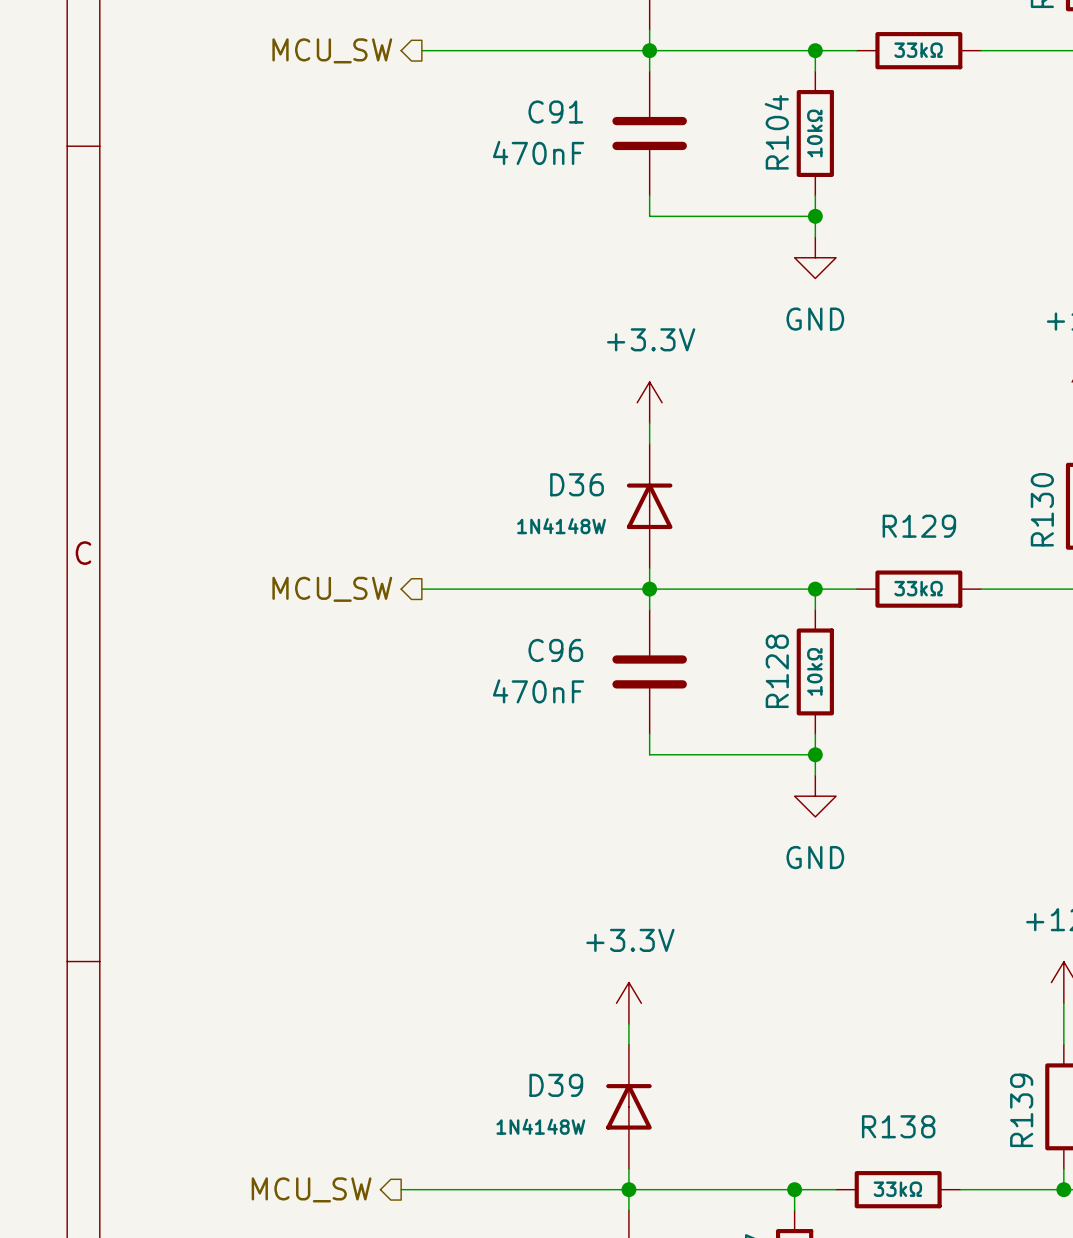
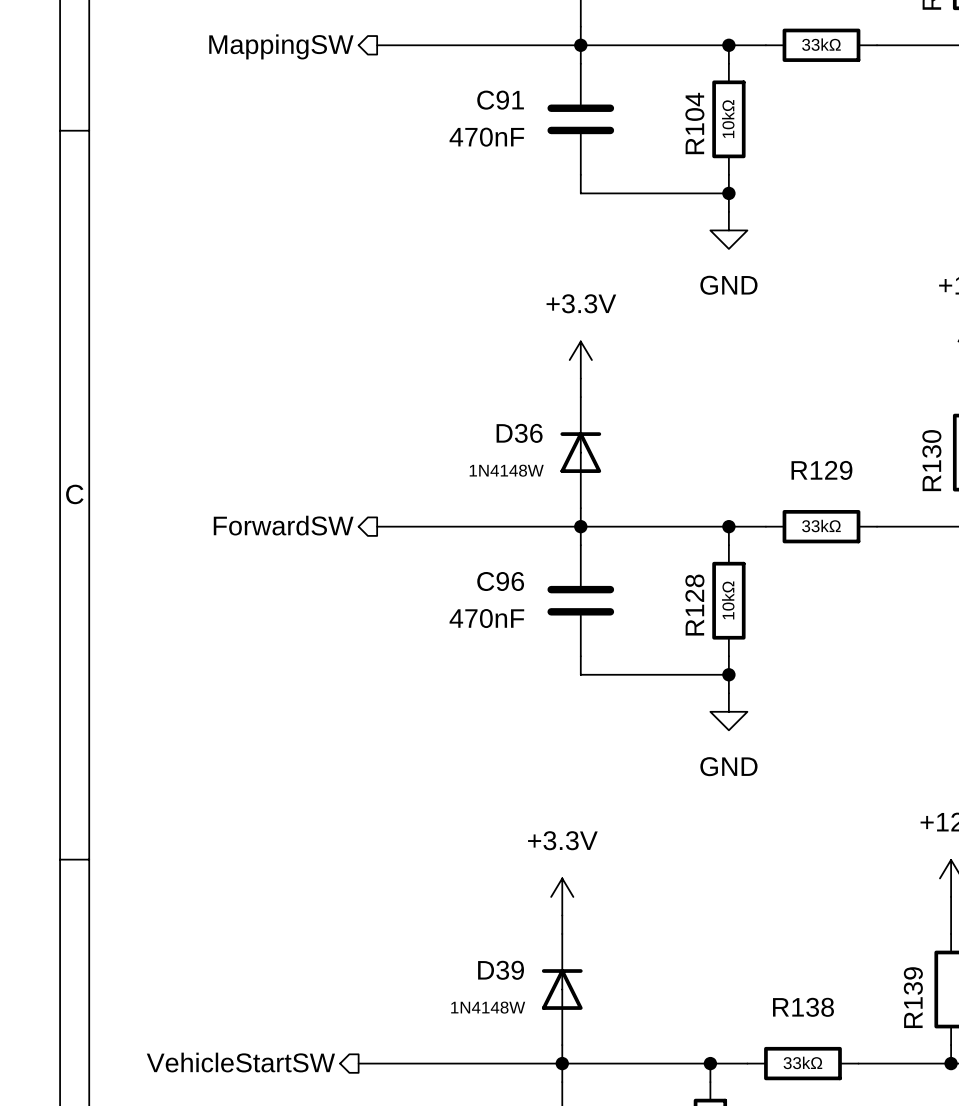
hierarchical label: MCU_SW (332, 50) -> MappingSW (281, 46)
hierarchical label: MCU_SW (332, 589) -> ForwardSW (283, 525)
hierarchical label: MCU_SW (311, 1189) -> VehicleStartSW (240, 1062)

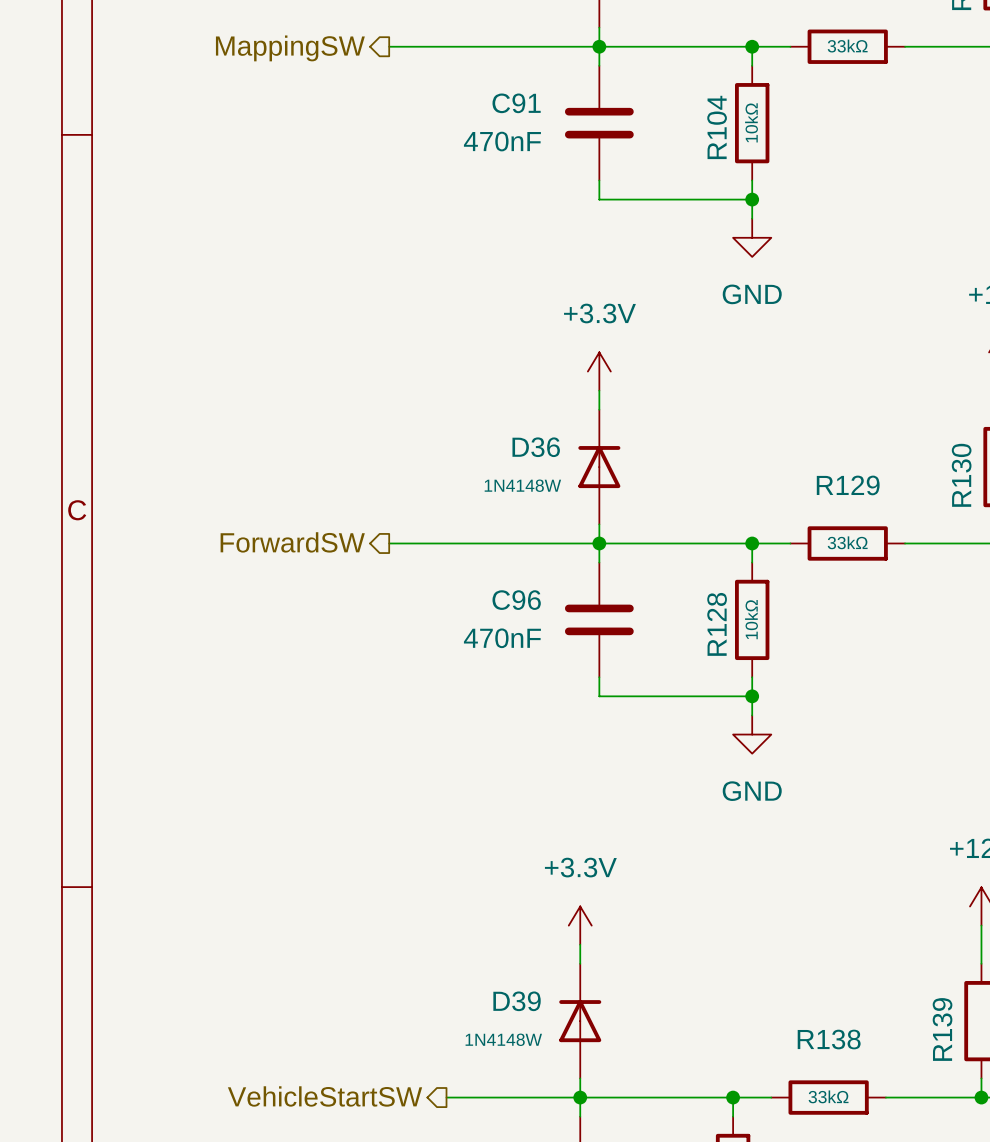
hierarchical label position: VehicleStartSW (240, 1062) -> VehicleStartSW (325, 1096)
wire: (358, 1063) (432, 1063) -> none

